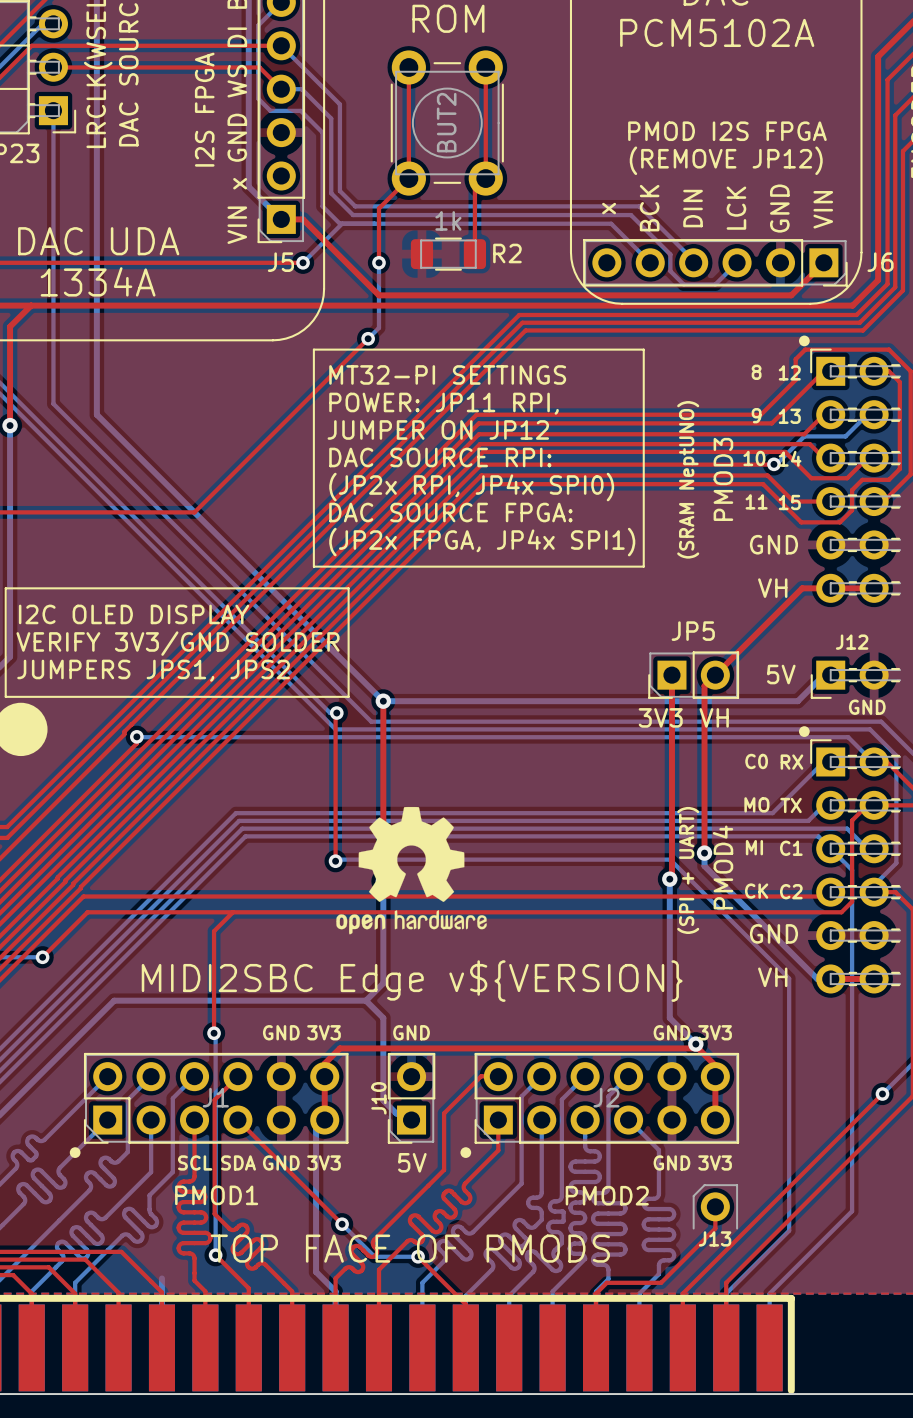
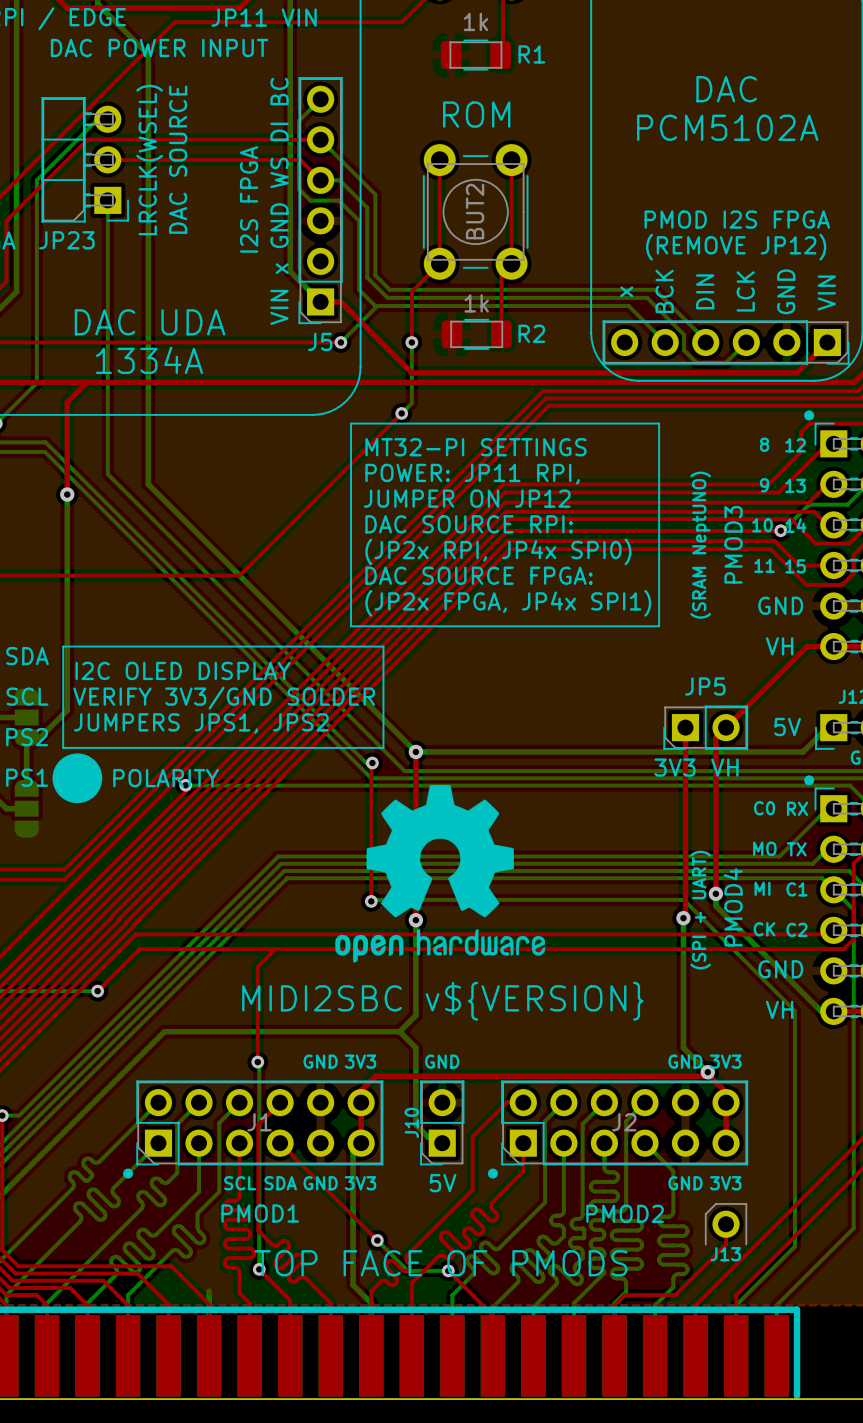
text: none -> POLARITY (166, 778)
drawing: none -> [335, 784, 546, 963]
drawing: [336, 806, 487, 935] -> none
text: MIDI2SBC Edge v${VERSION} (412, 981) -> MIDI2SBC v${VERSION} (442, 1001)

